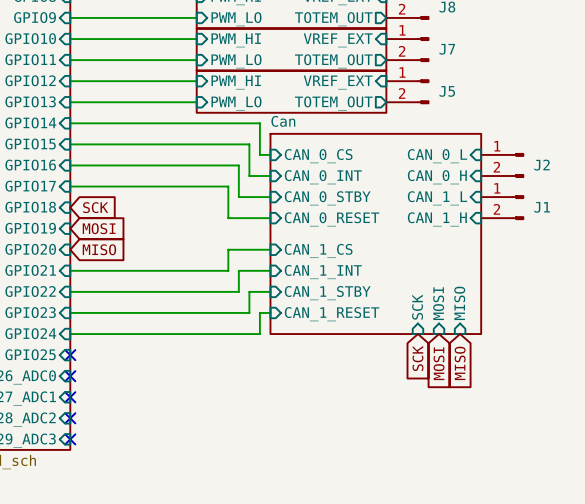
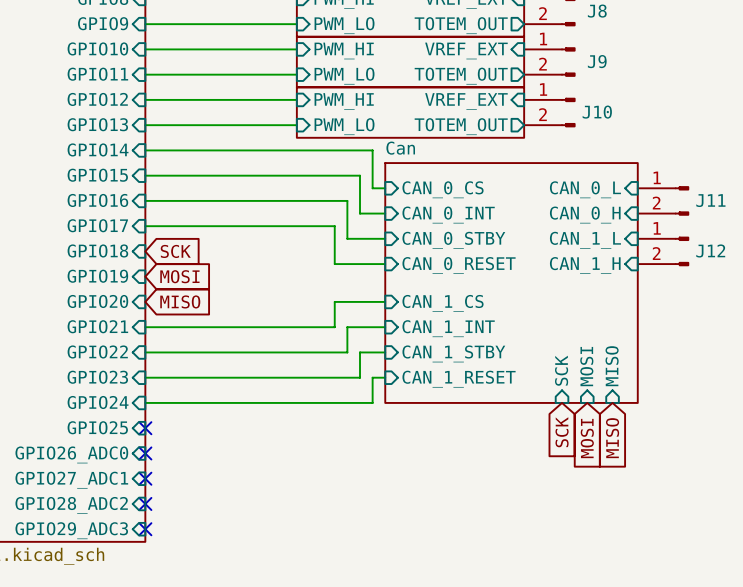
J7 name: J7 (447, 49) -> J9 (597, 61)
J5 name: J5 (447, 91) -> J10 (597, 112)
J2 name: J2 (542, 165) -> J11 (710, 200)
J1 name: J1 (542, 207) -> J12 (710, 250)

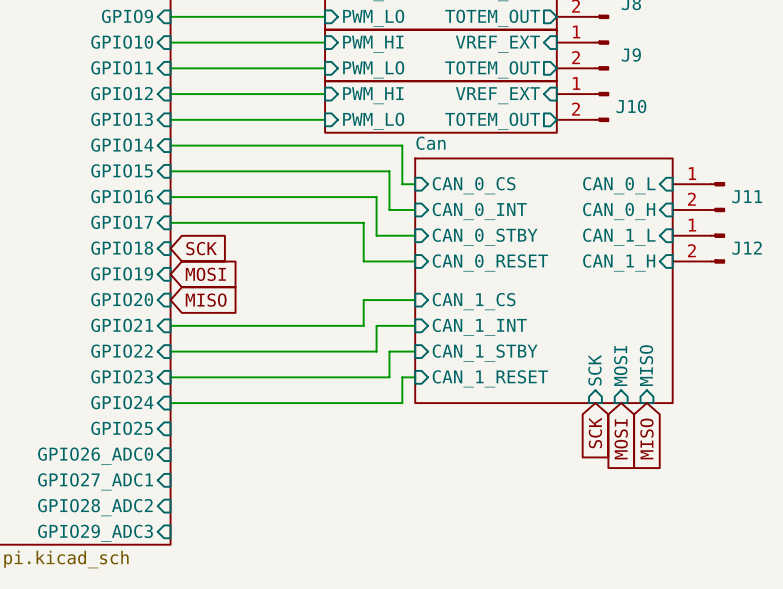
no-connect mark: (145, 428) -> none
no-connect mark: (145, 453) -> none
no-connect mark: (145, 478) -> none
no-connect mark: (145, 503) -> none
no-connect mark: (145, 529) -> none

